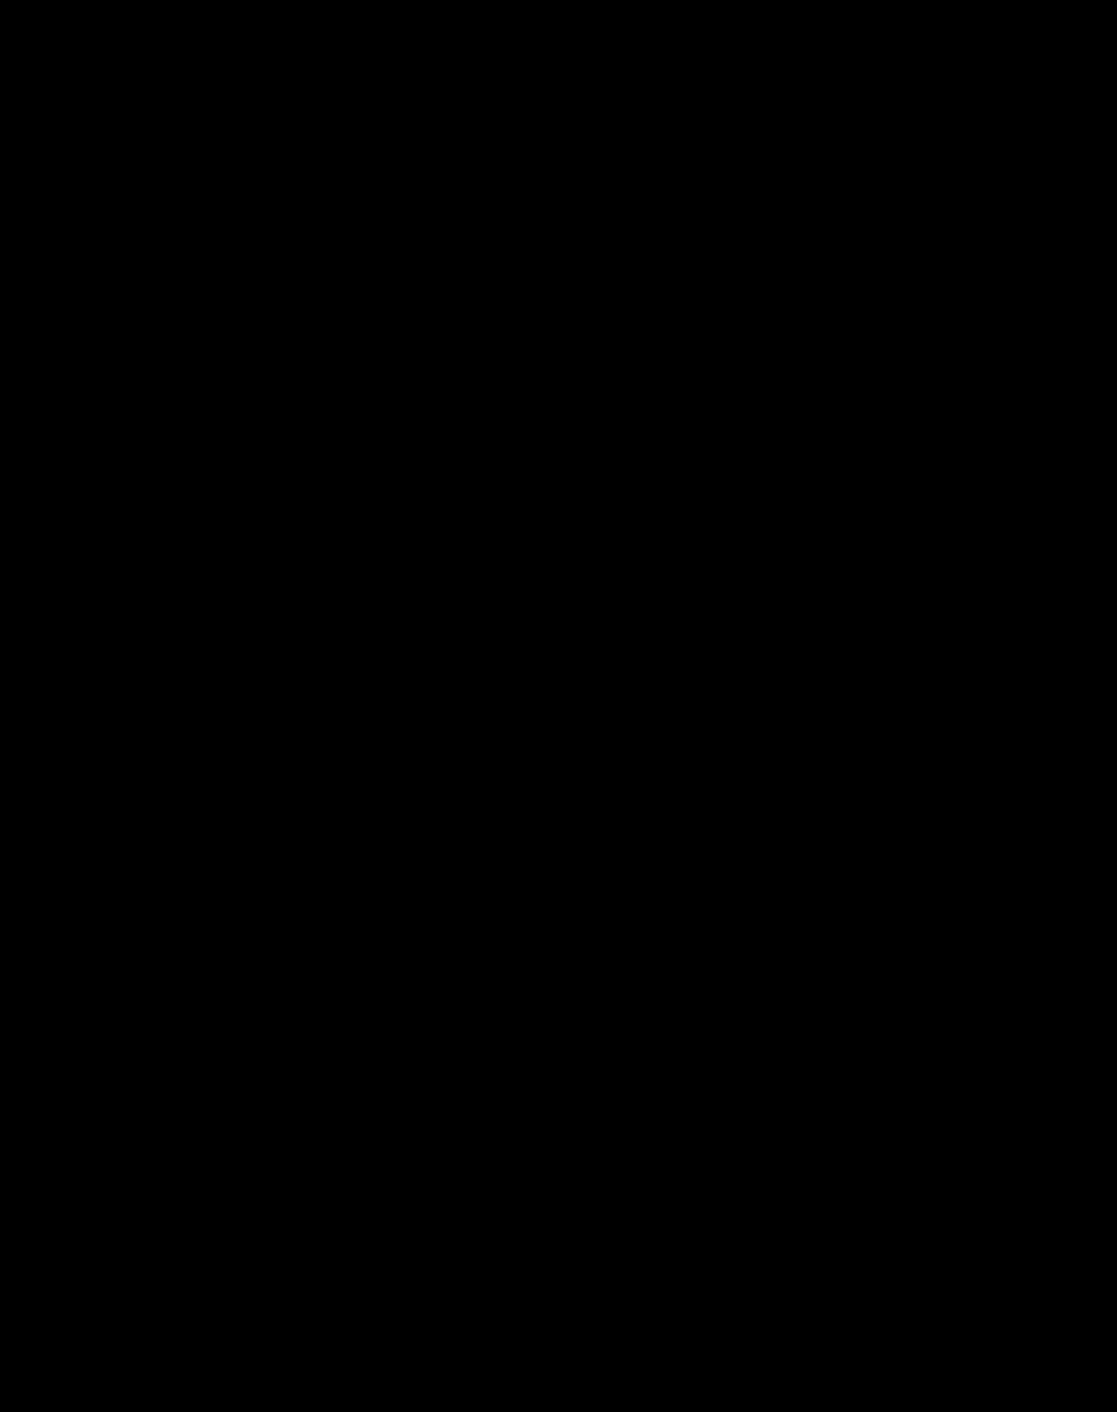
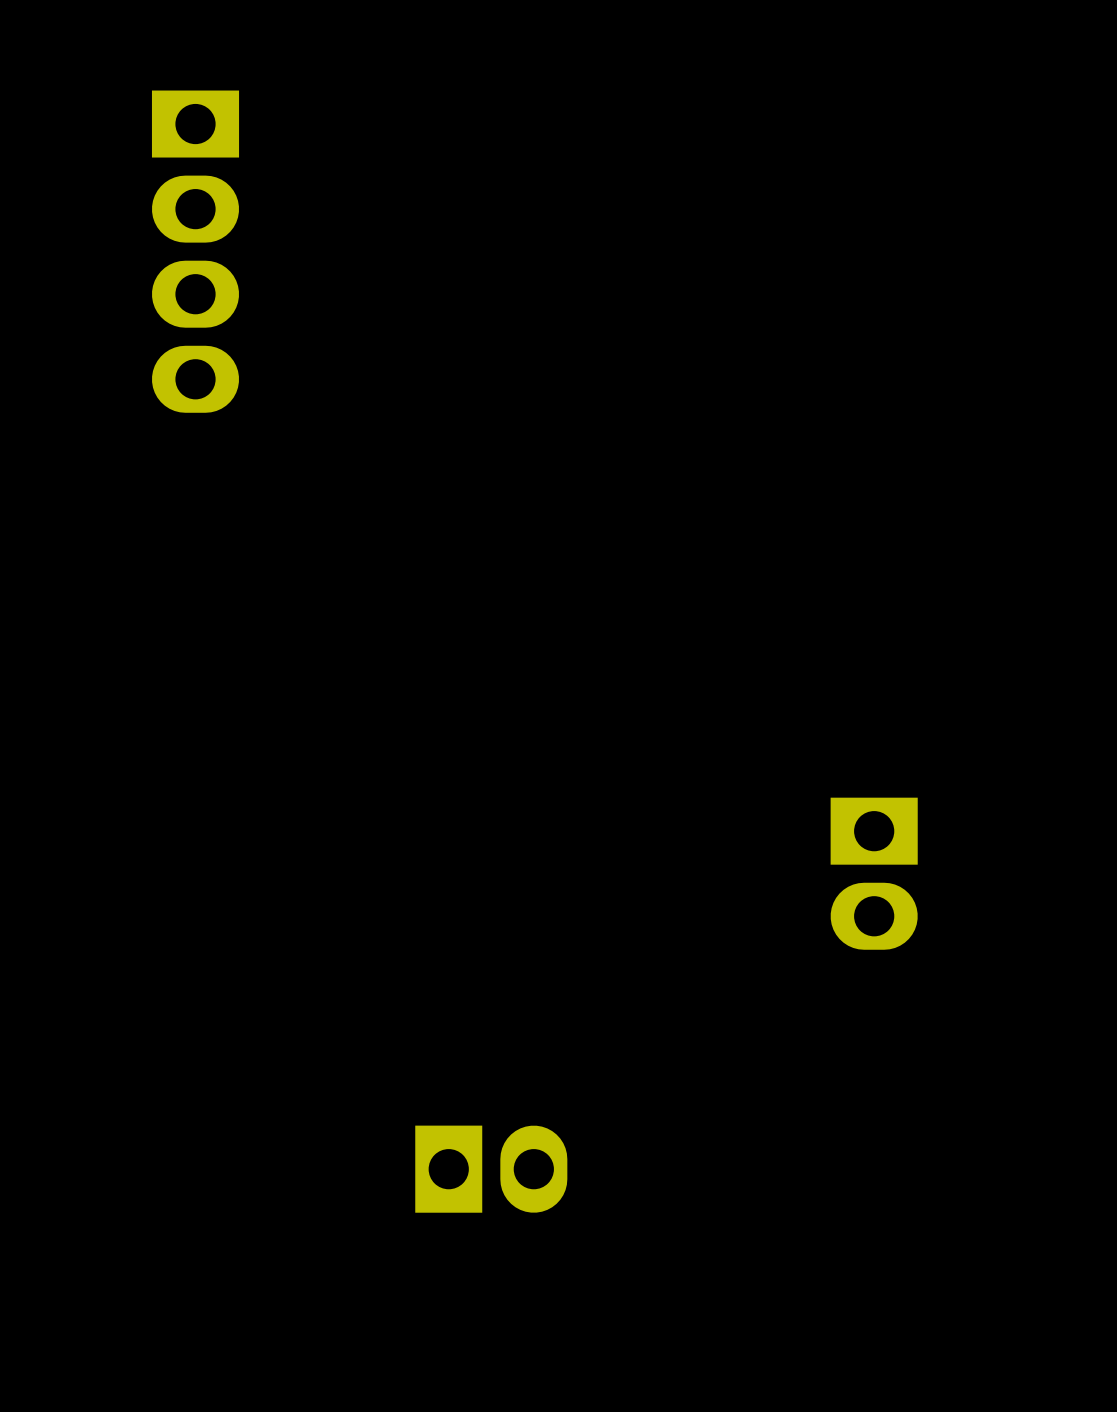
part: none -> (195, 251)
part: none -> (874, 873)
part: none -> (491, 1169)

